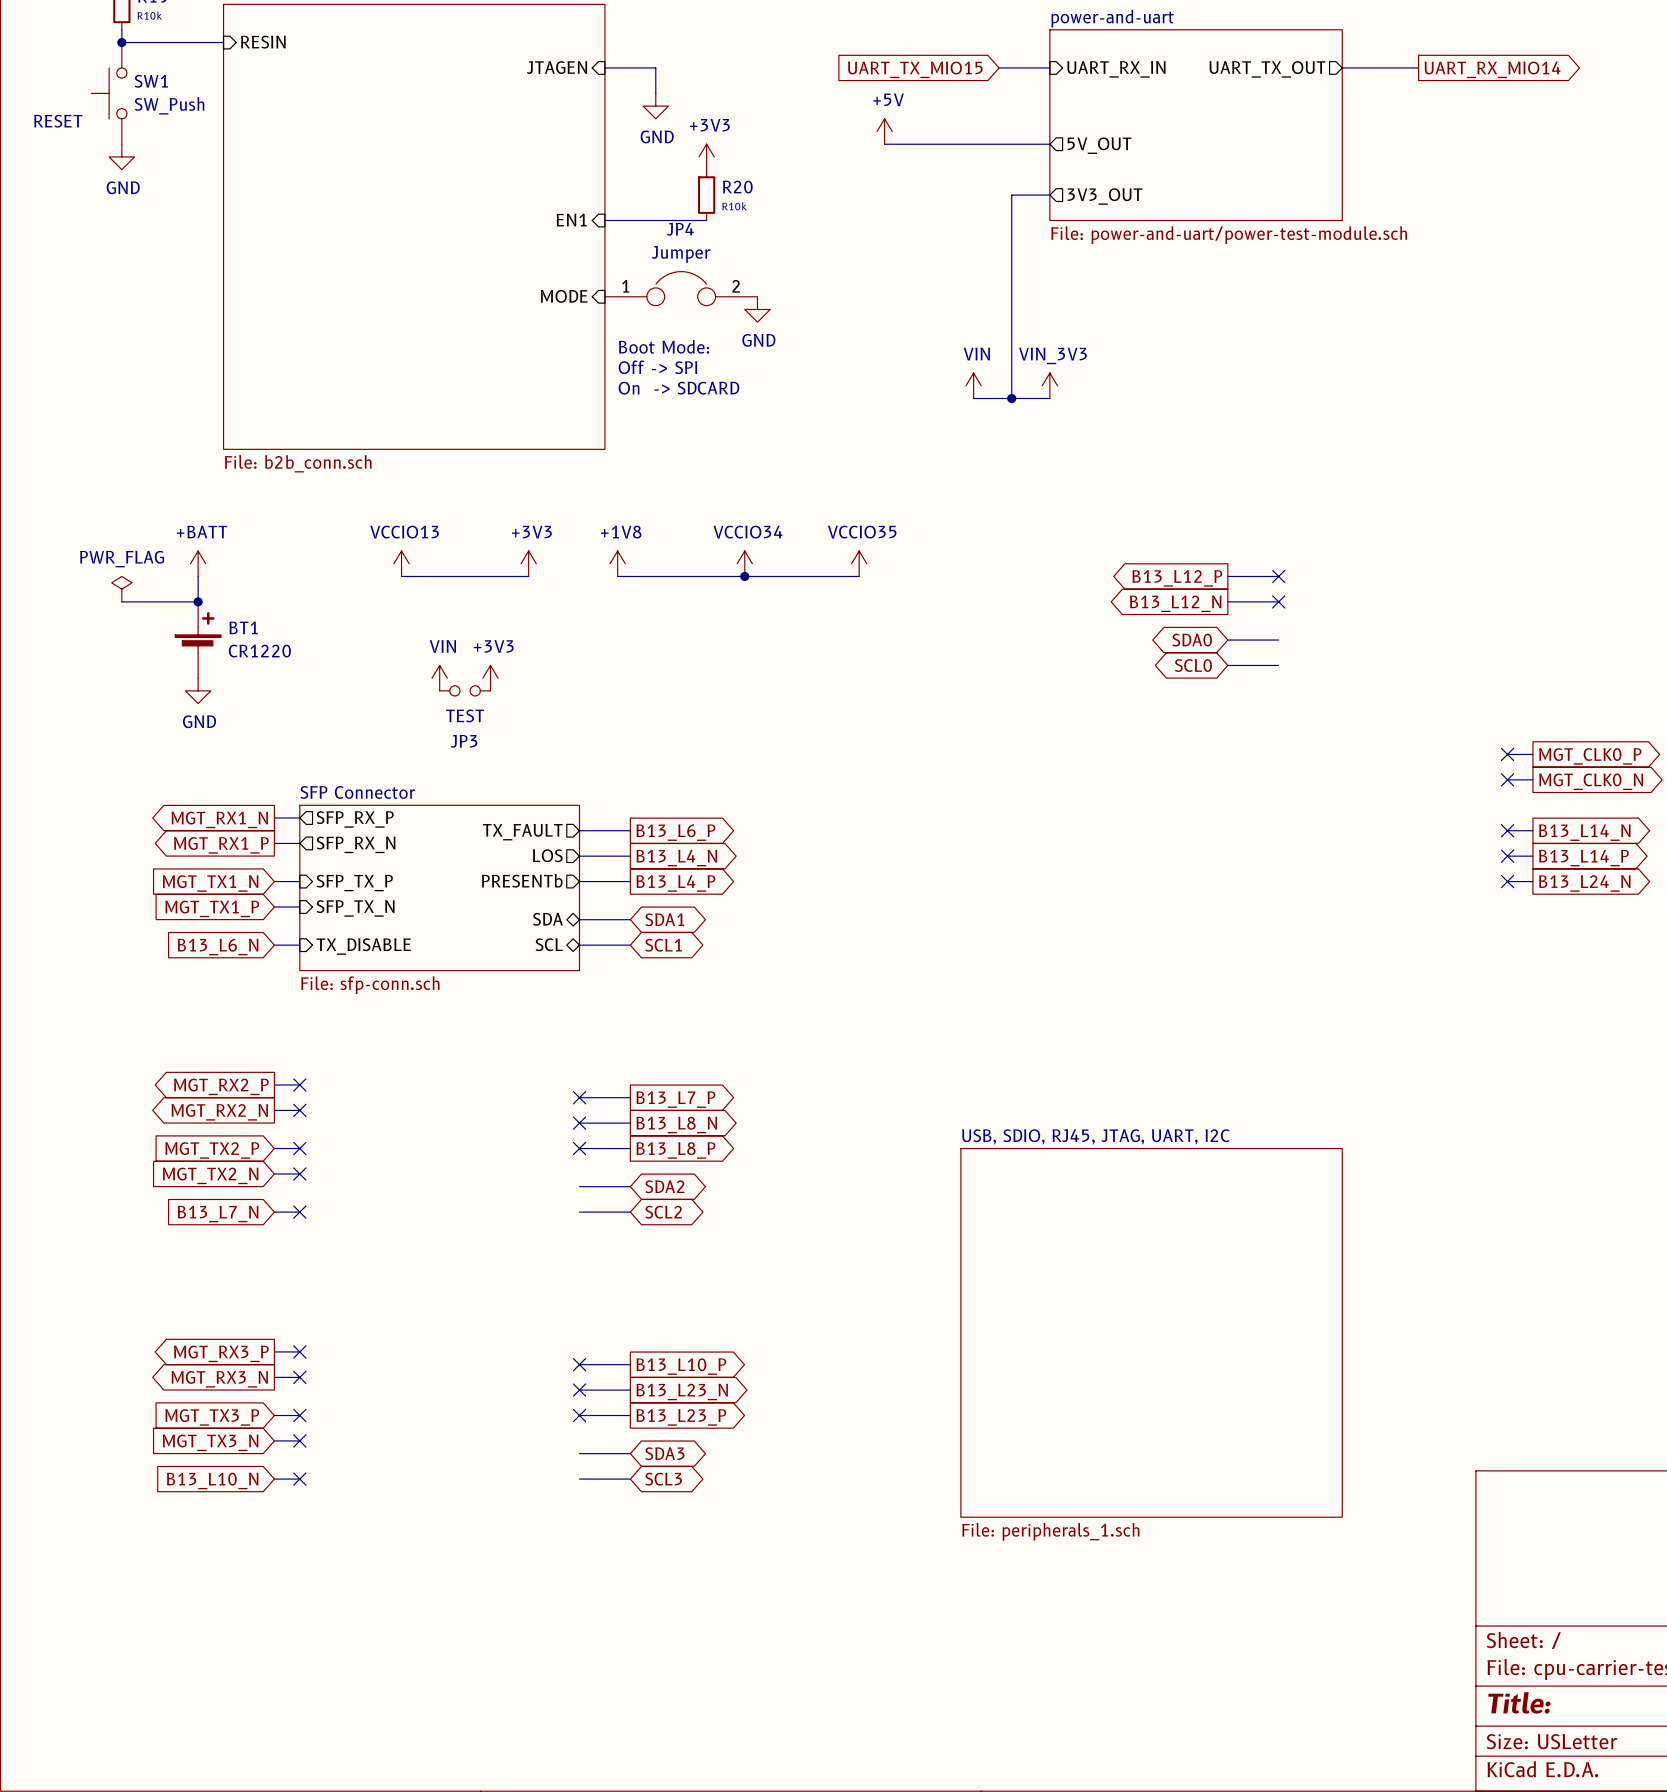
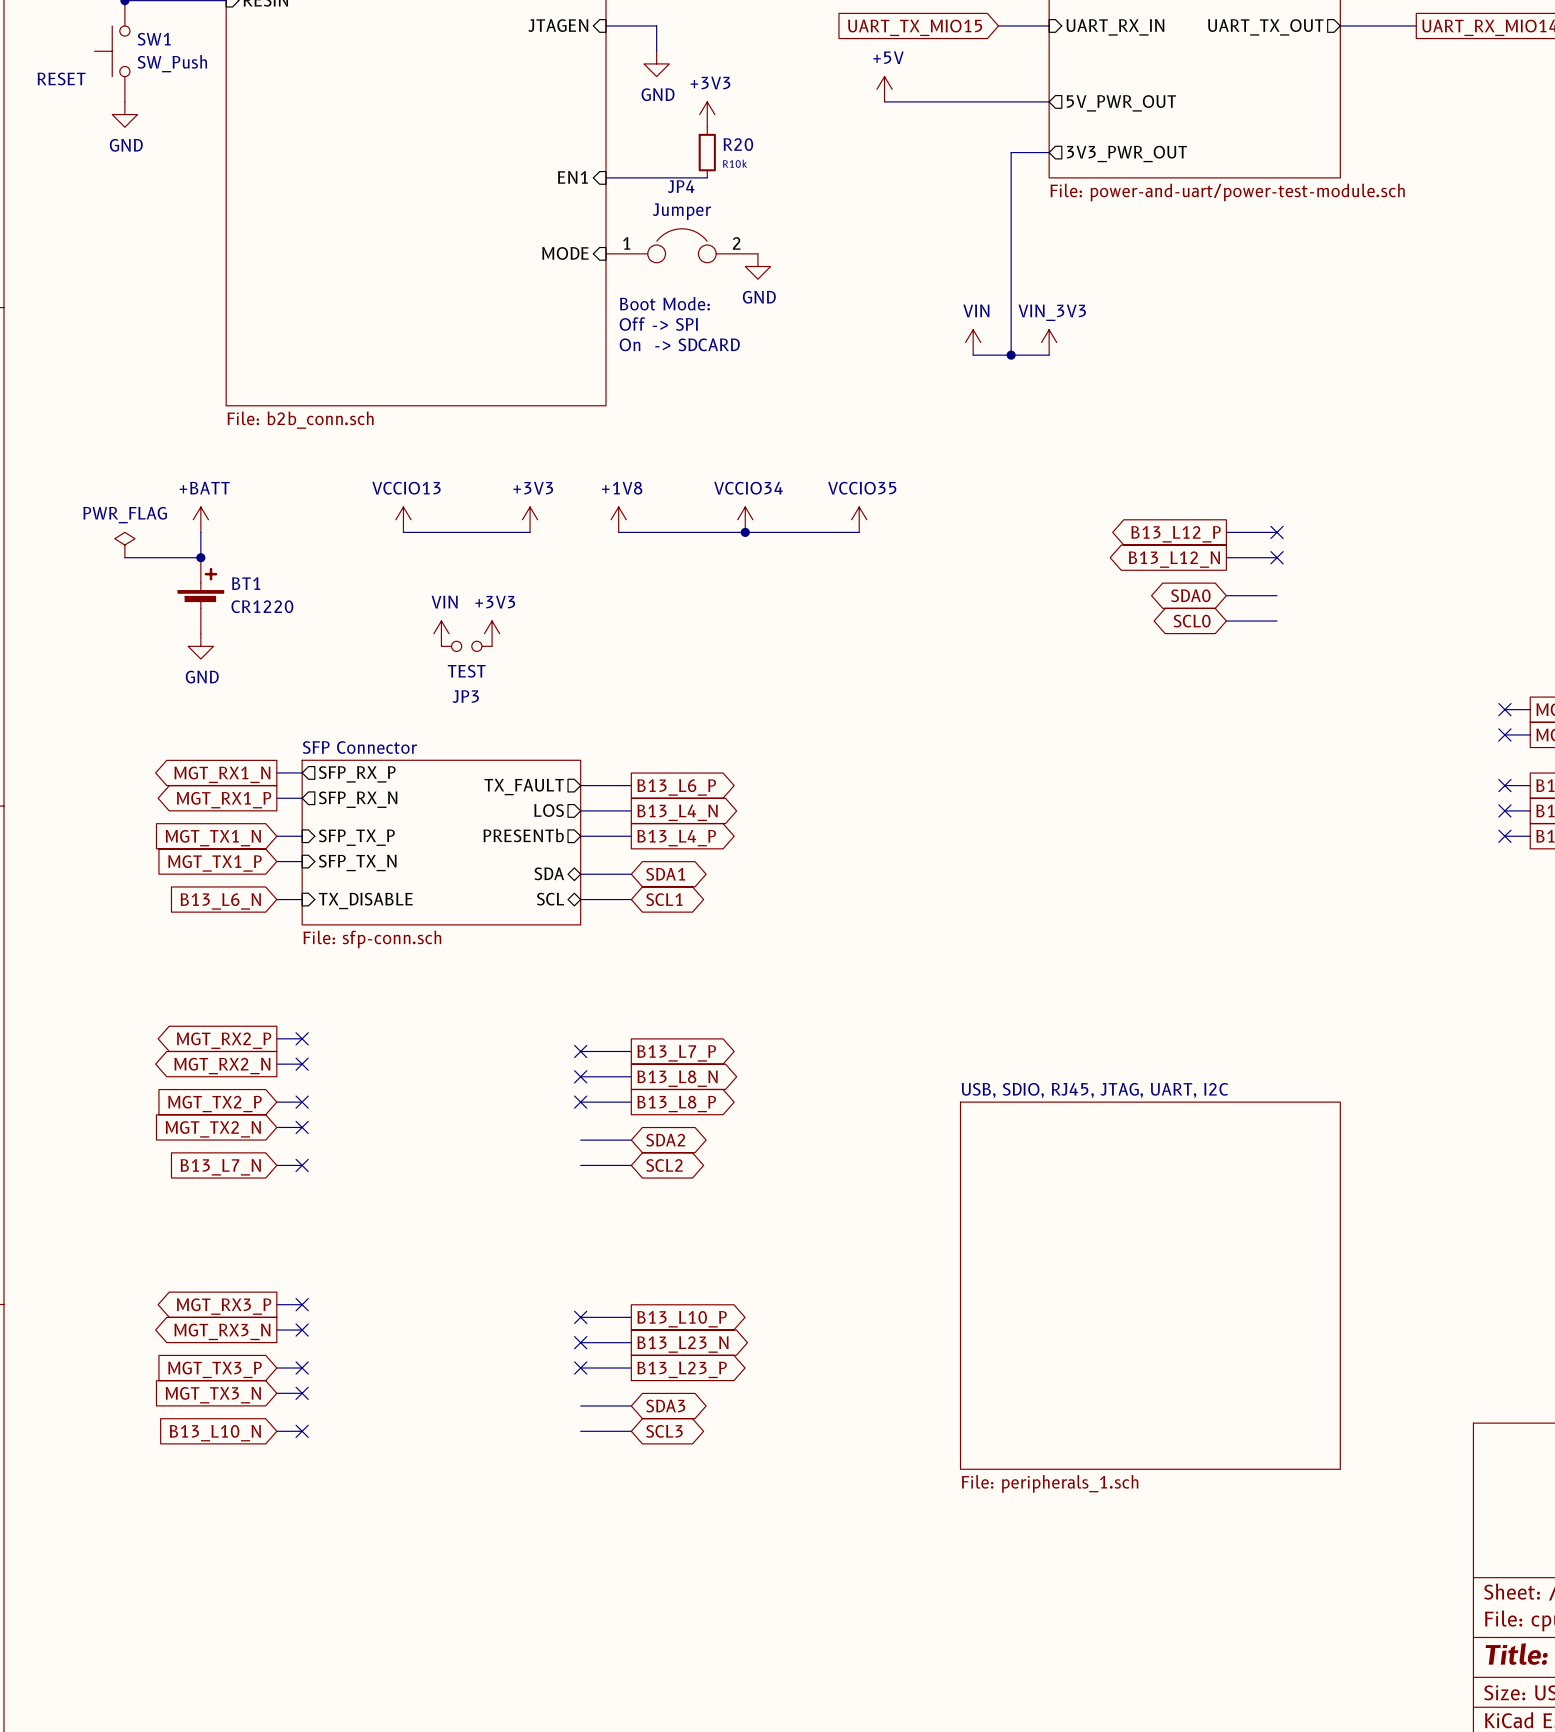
sheet pin: 5V_OUT (1099, 145) -> 5V_PWR_OUT (1121, 103)
sheet pin: 3V3_OUT (1104, 196) -> 3V3_PWR_OUT (1126, 153)

